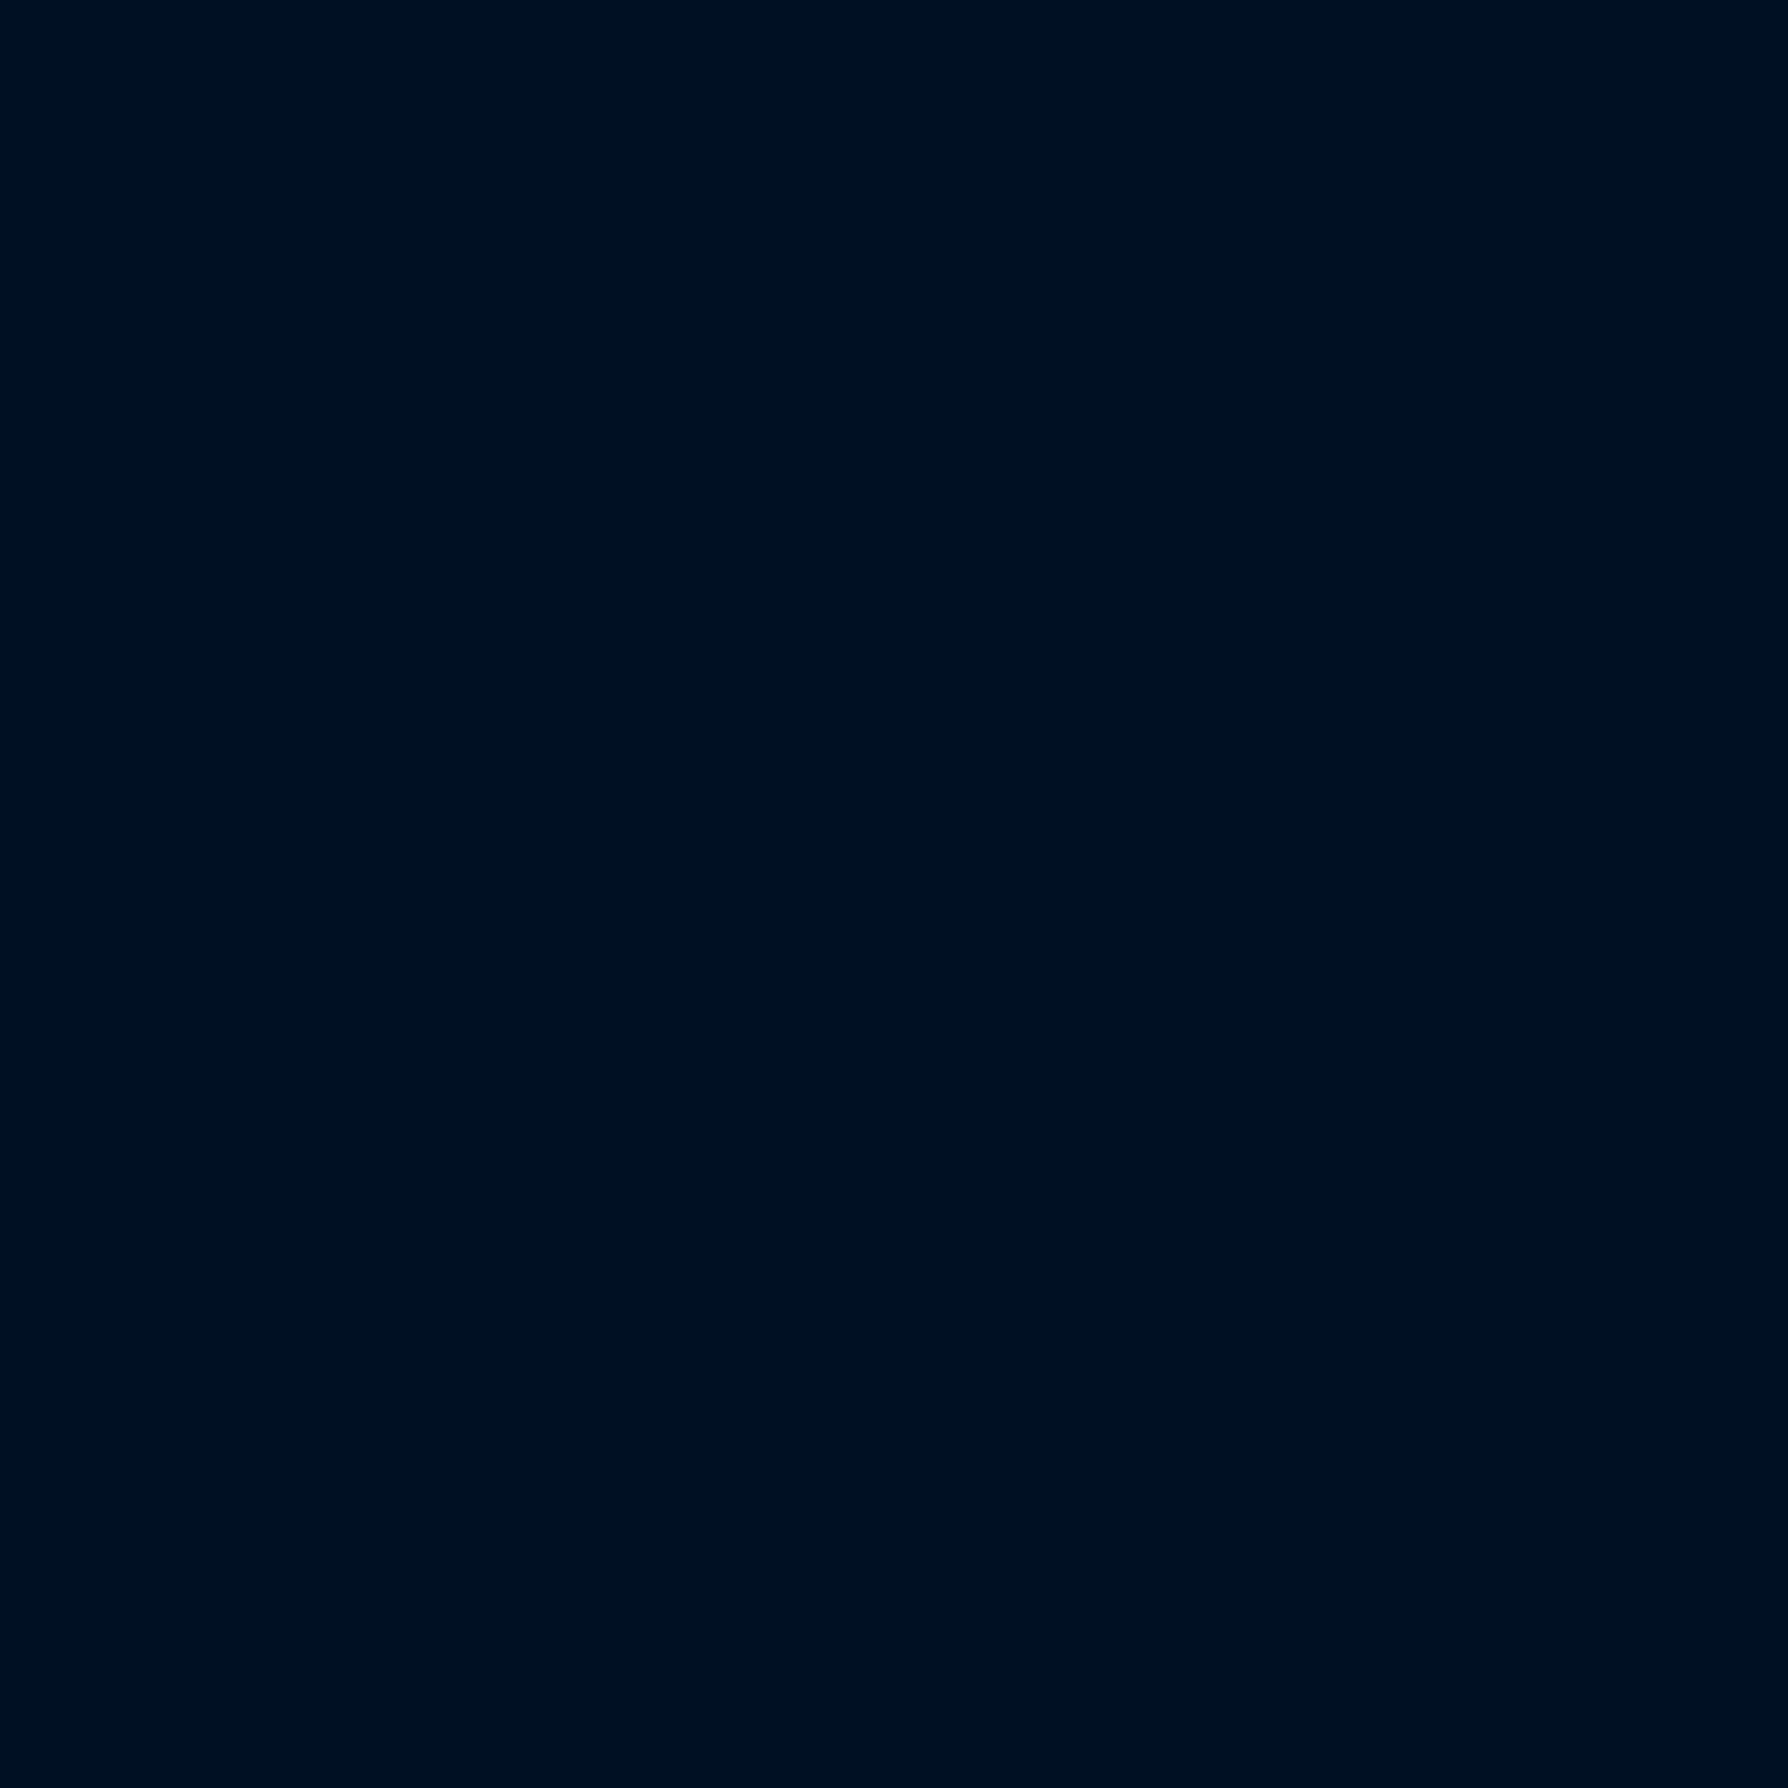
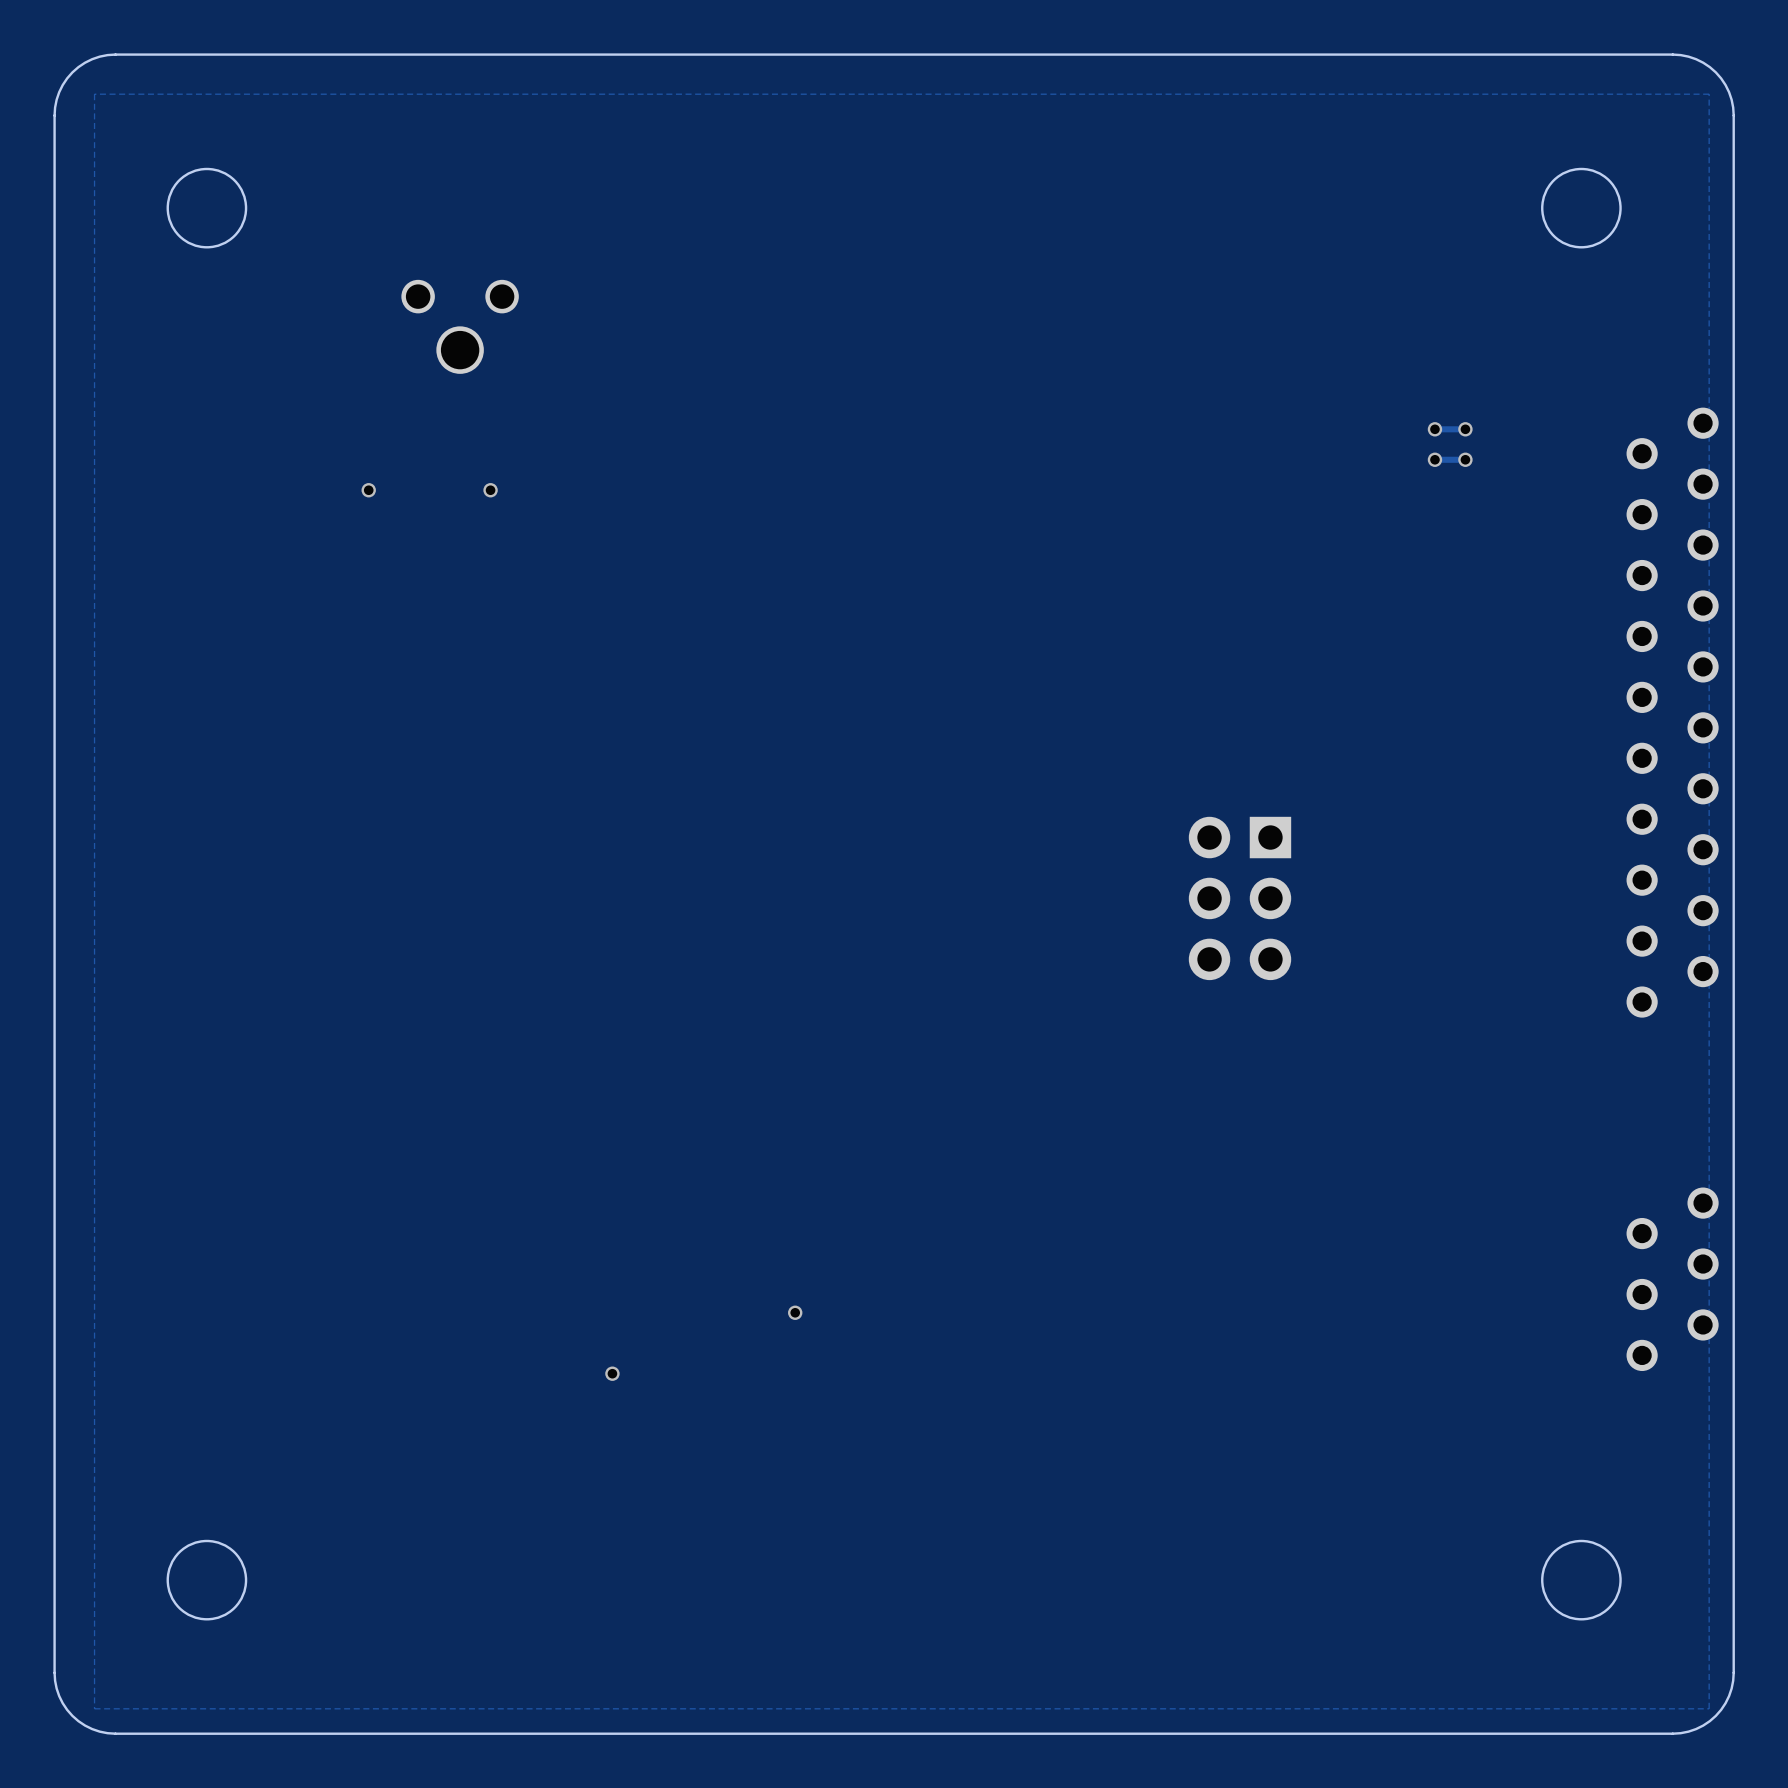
board edge: none -> (1672, 54) (115, 54) (92, 59) (72, 72) (59, 92) (54, 115) (54, 1672) (59, 1696) (72, 1715) (92, 1729) (115, 1733) (1672, 1733) (1696, 1729) (1715, 1715) (1729, 1696) (1733, 1672) (1733, 115) (1729, 92) (1715, 72) (1696, 59) (1672, 54)
zone outline: none -> (1709, 94) (94, 94) (94, 1708) (1709, 1708) (1709, 94)
round board edge: none -> [166, 167, 248, 249]
round board edge: none -> [1541, 167, 1622, 249]
part: none -> (460, 326)
via: none -> (1434, 429)
track: none -> (1465, 429) (1434, 429)
via: none -> (1465, 429)
via: none -> (1434, 459)
track: none -> (1465, 459) (1434, 459)
via: none -> (1465, 459)
via: none -> (368, 490)
via: none -> (490, 490)
part: none -> (1672, 712)
part: none -> (1240, 898)
part: none -> (1672, 1279)
via: none -> (795, 1312)
via: none -> (612, 1373)
round board edge: none -> [166, 1539, 248, 1621]
round board edge: none -> [1541, 1539, 1622, 1621]

